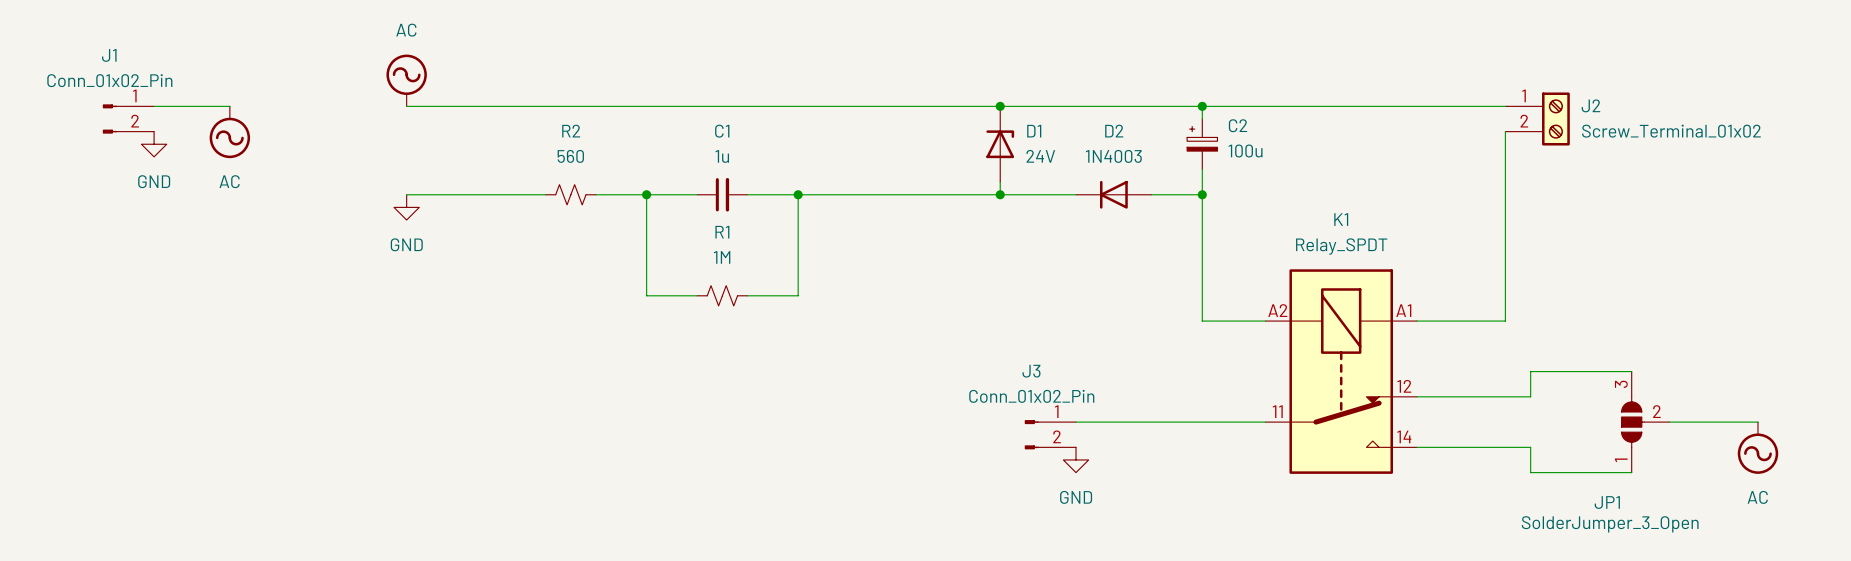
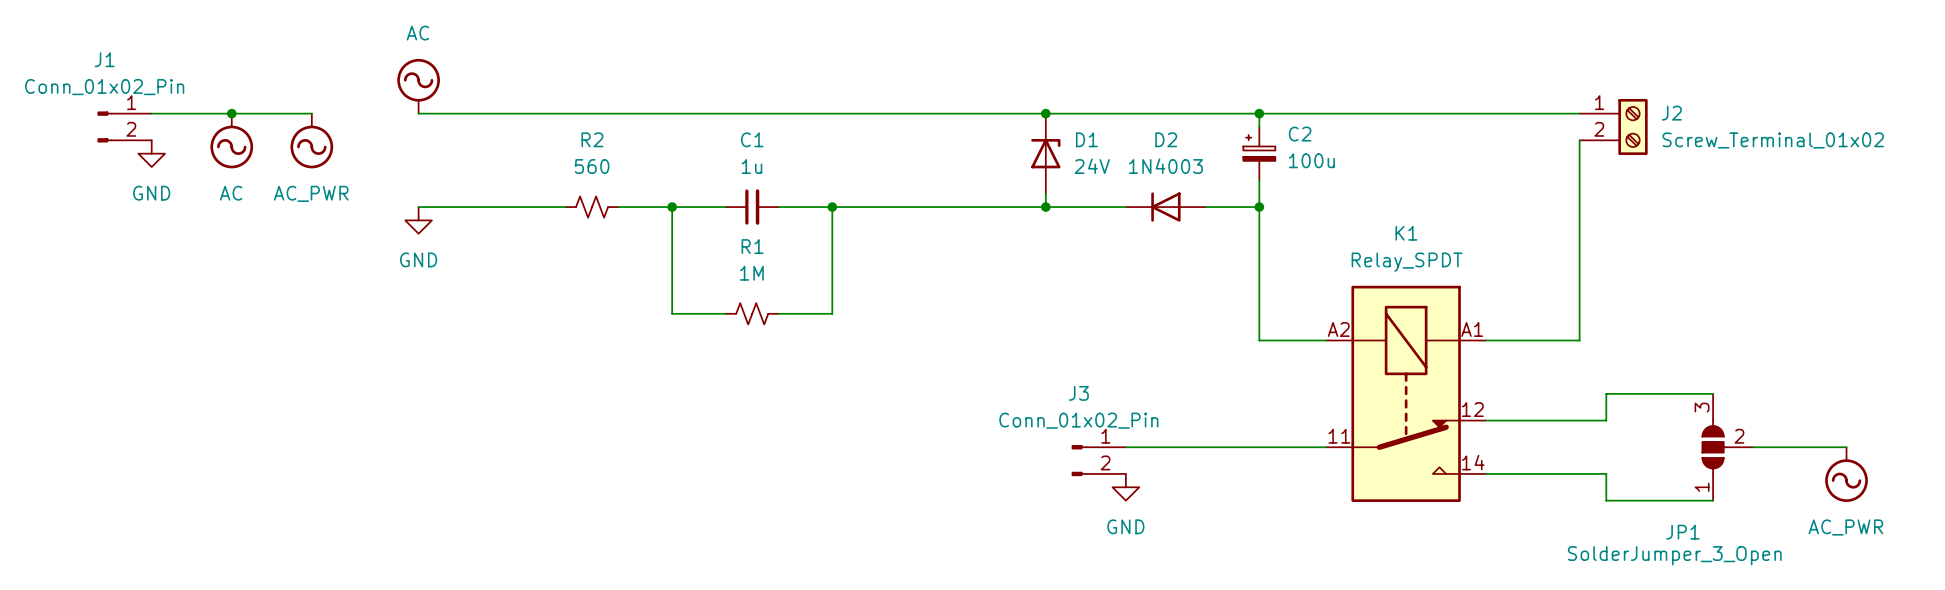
wire: none -> (231, 113) (311, 113)
junction: none -> (231, 113)
power symbol: none -> AC_PWR (311, 140)
power symbol: AC (1757, 447) -> AC_PWR (1846, 474)

